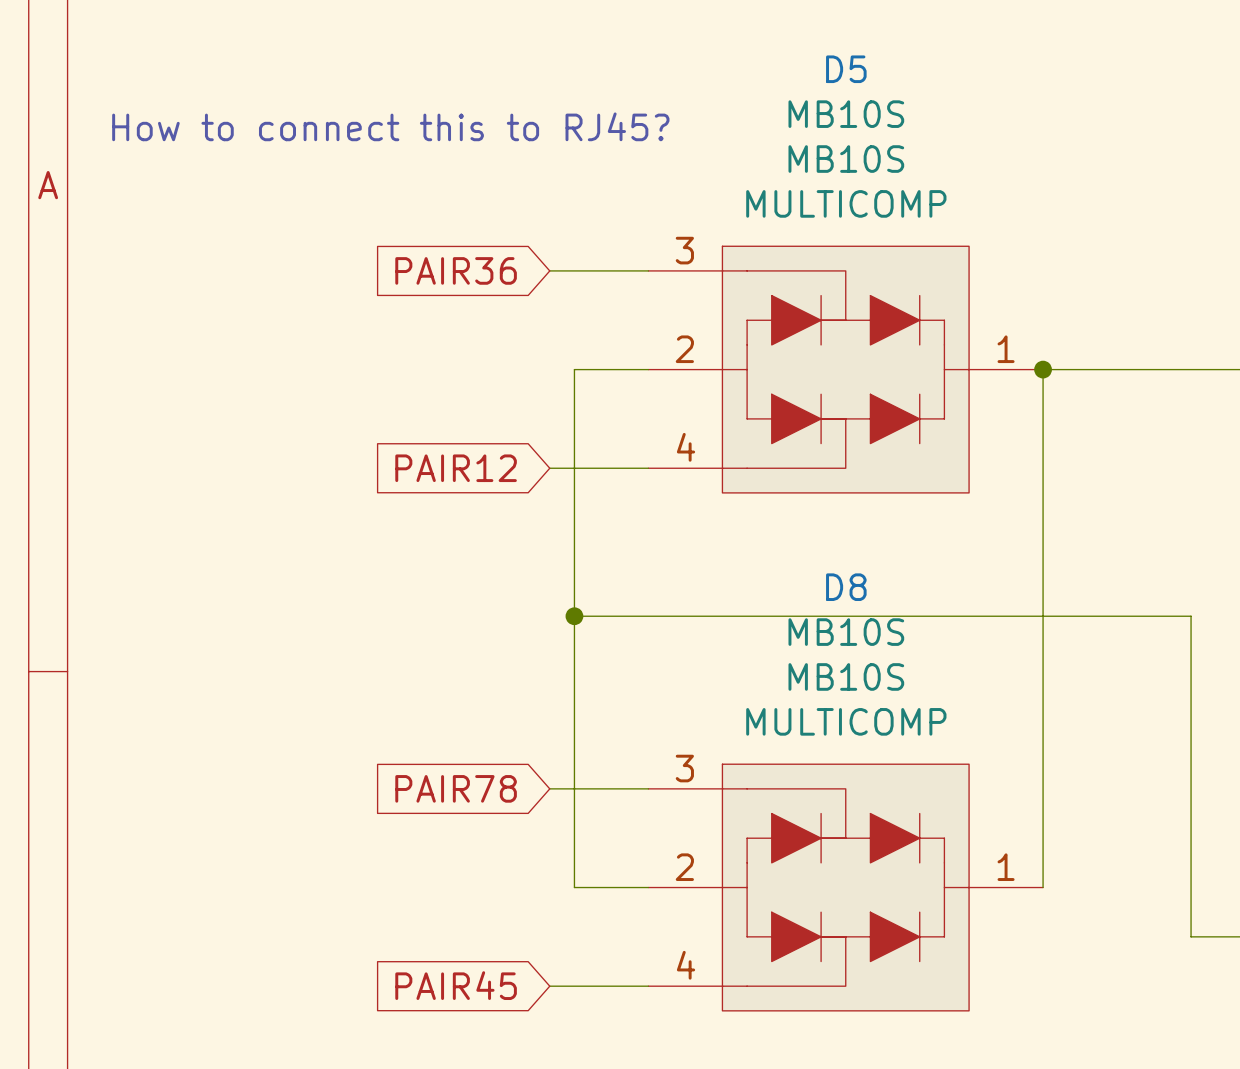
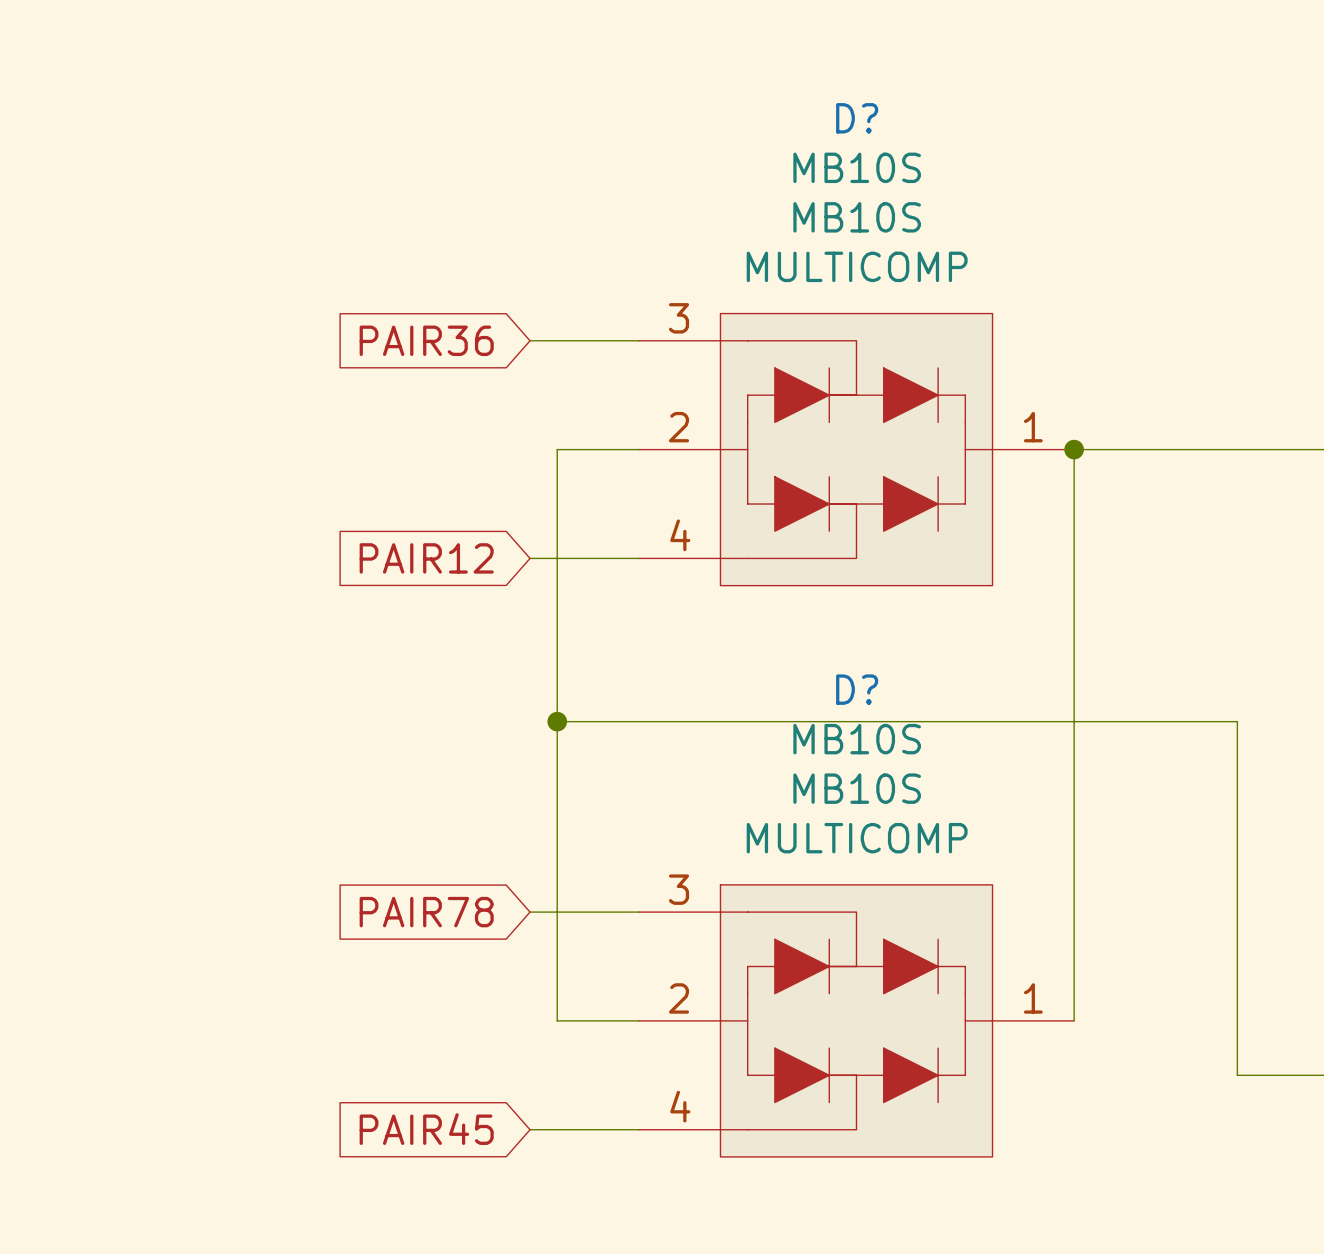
D5 name: D5 (846, 69) -> D? (857, 118)
text: How to connect this to RJ45? (390, 126) -> none
D8 name: D8 (846, 587) -> D? (857, 689)

